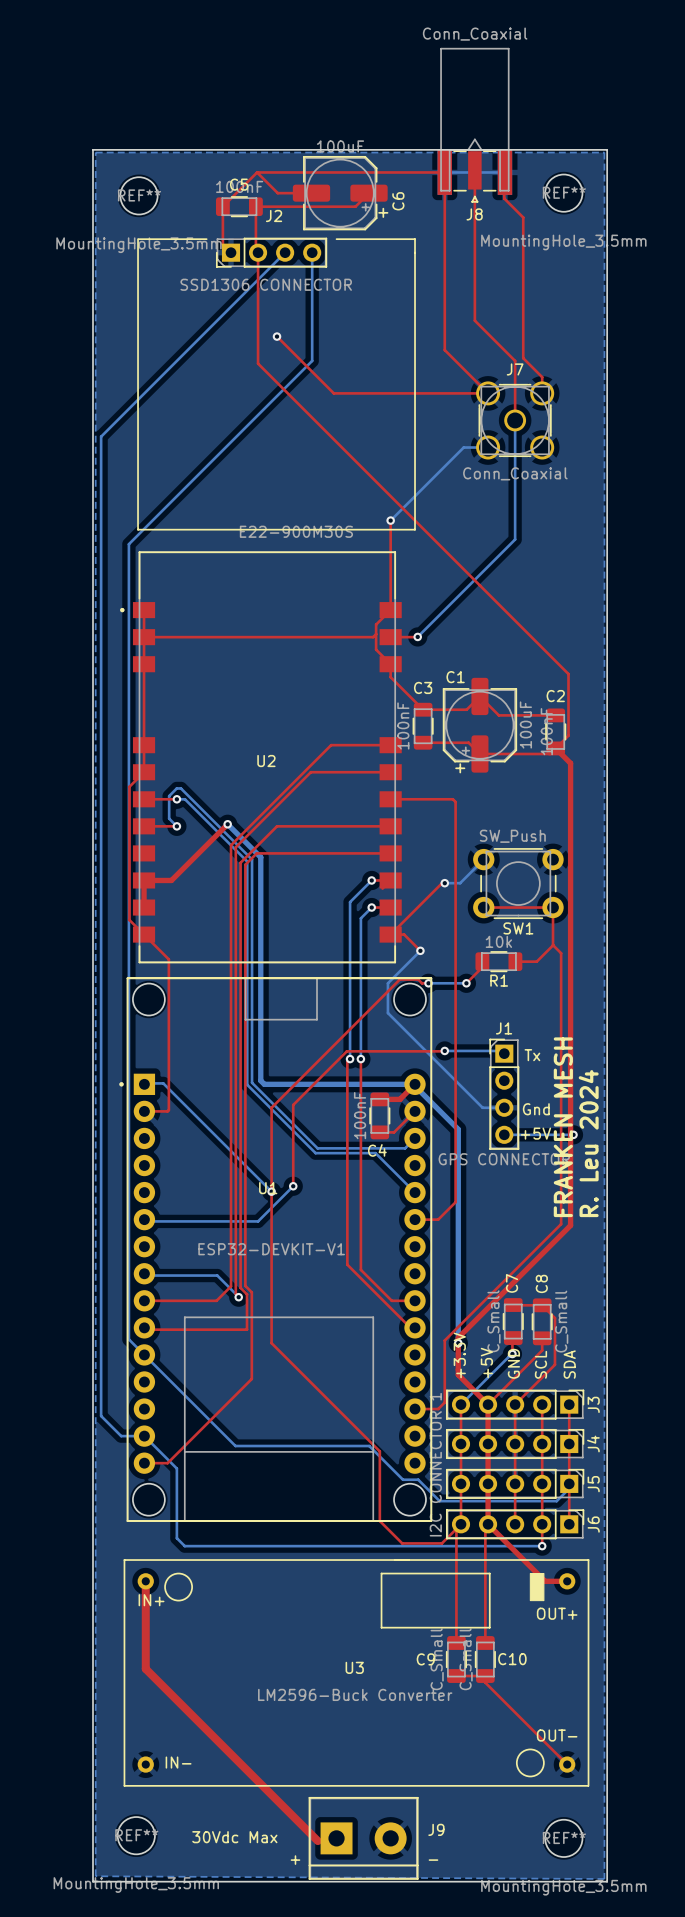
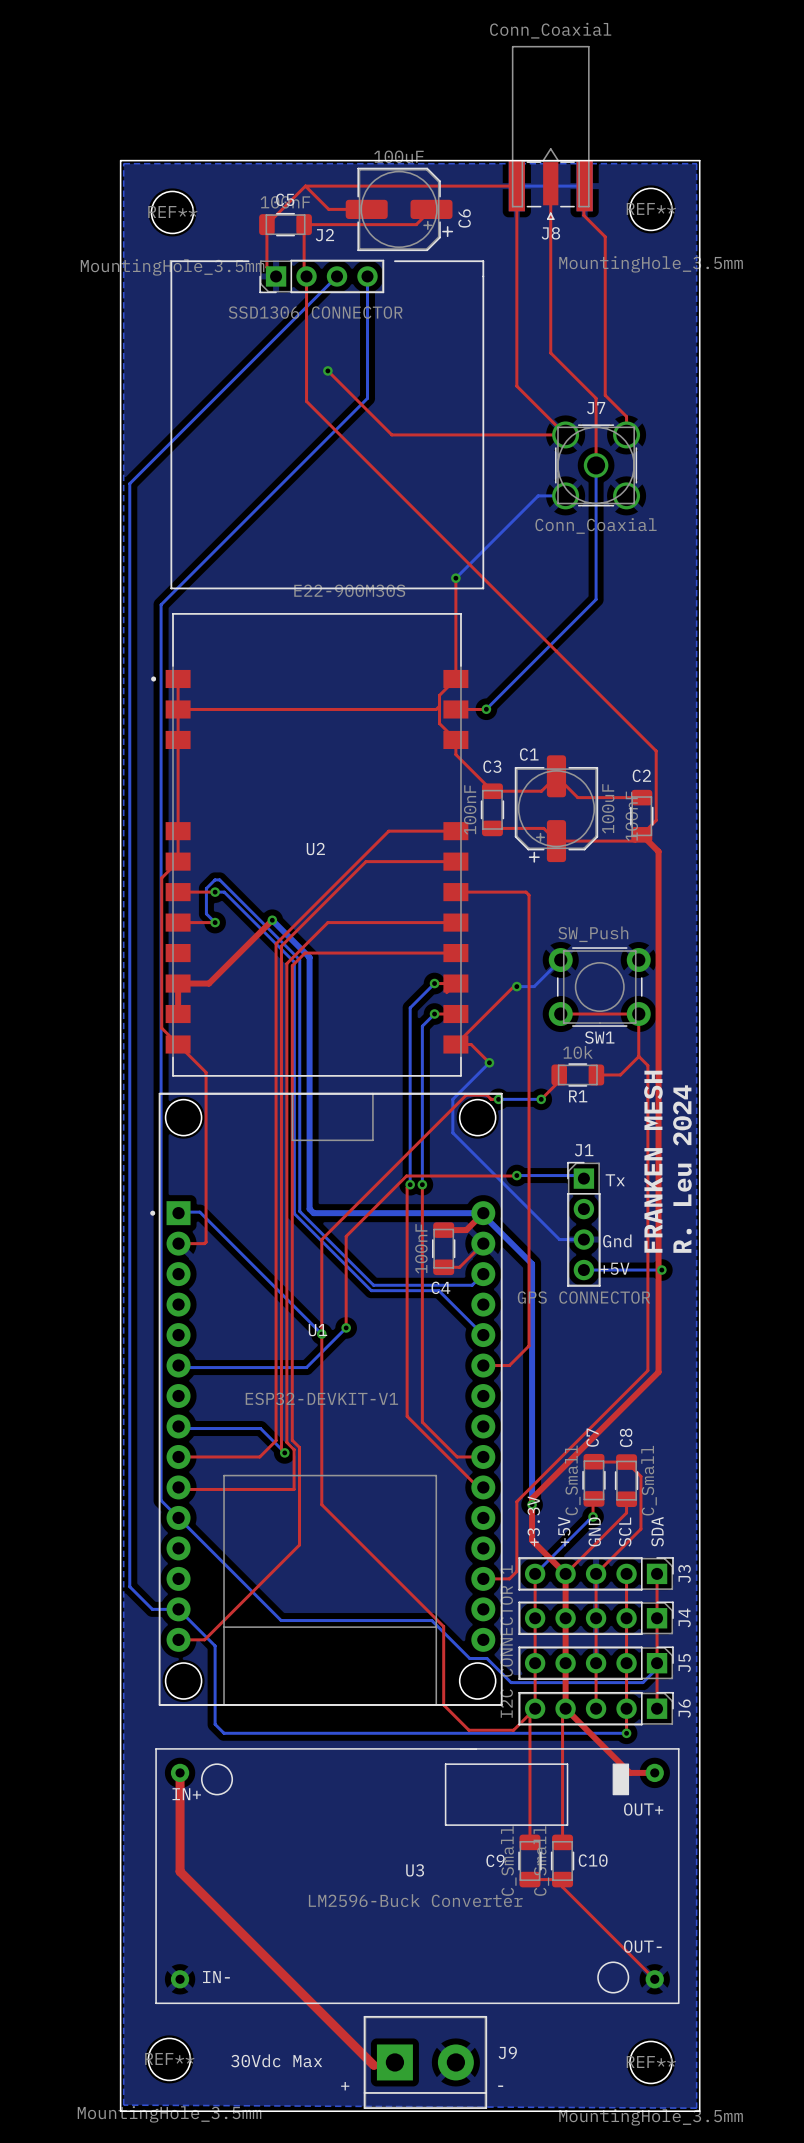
text position: FRANKEN MESH (563, 1127) -> FRANKEN MESH (653, 1161)
text position: R. Leu 2024 (588, 1143) -> R. Leu 2024 (682, 1169)

